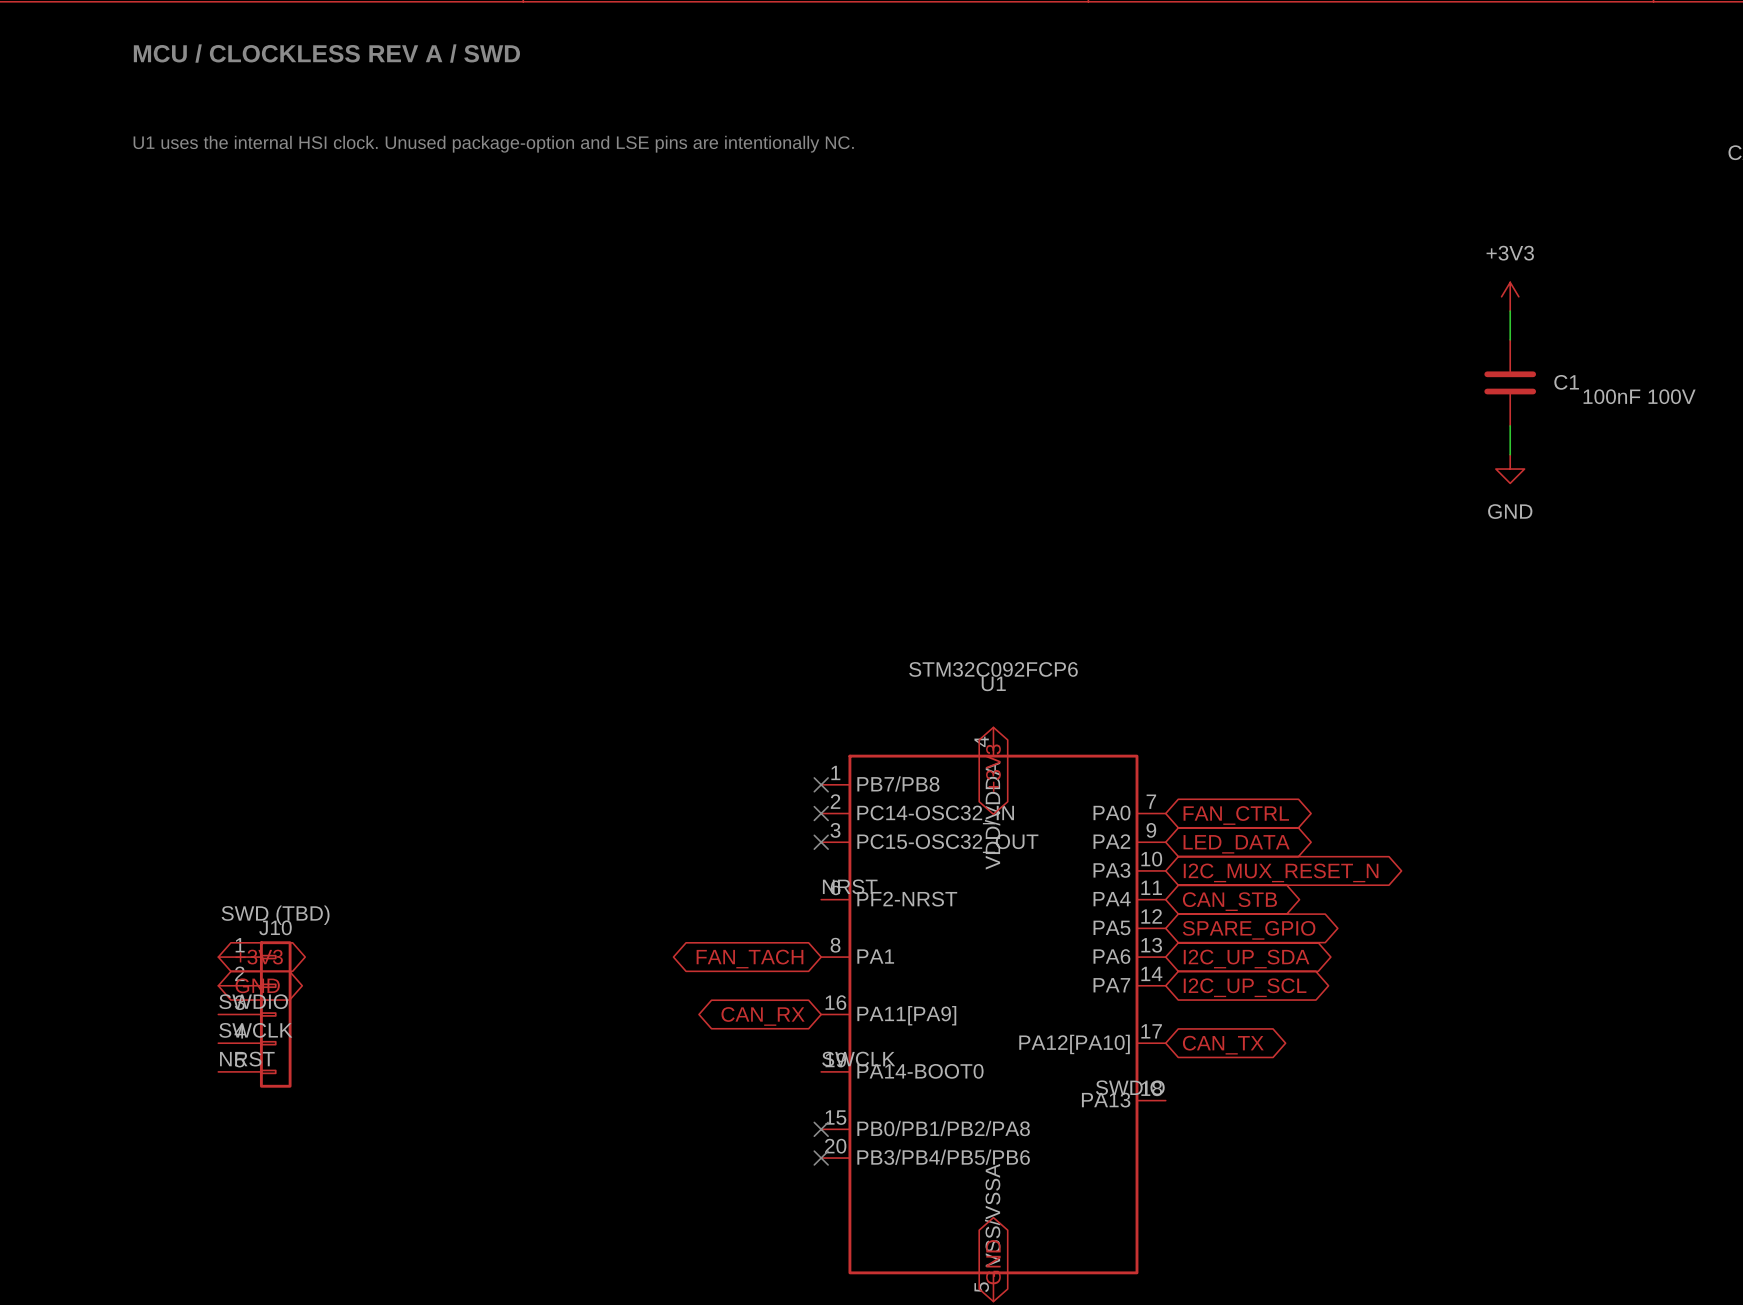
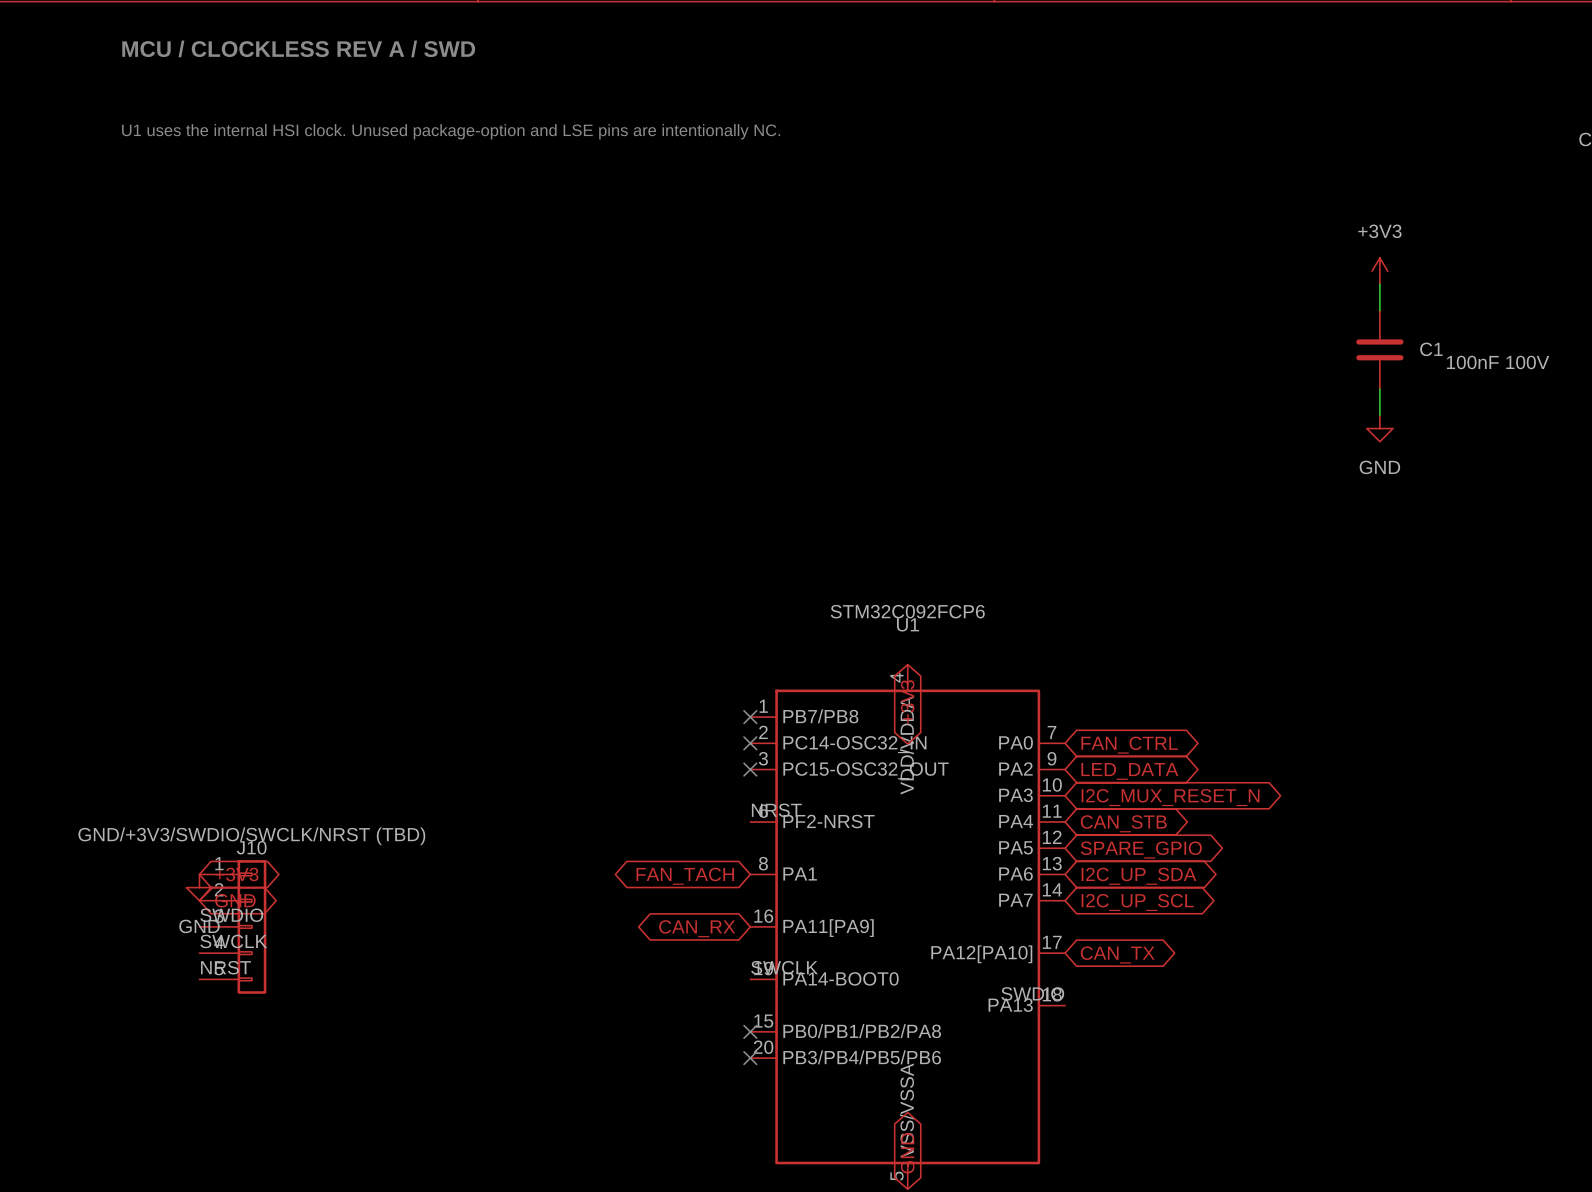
J10 value: SWD (TBD) (275, 915) -> GND/+3V3/SWDIO/SWCLK/NRST (TBD) (251, 836)
power symbol: none -> GND (199, 887)

